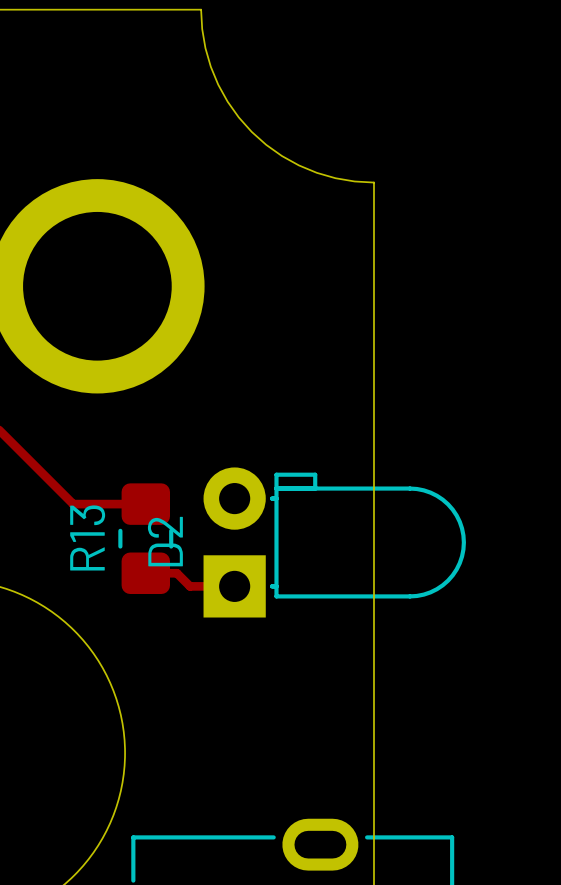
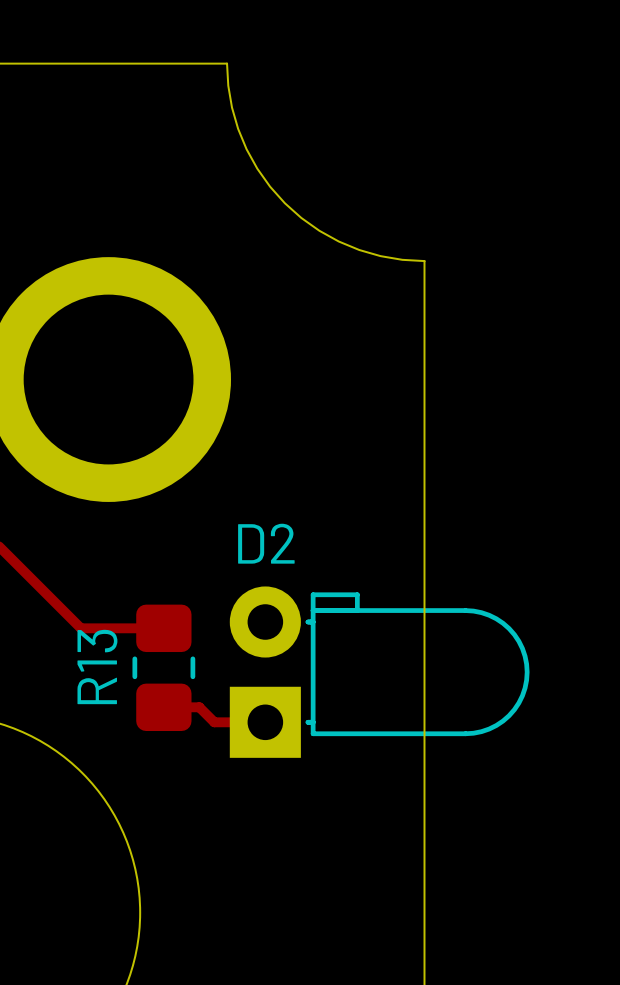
D2 name rotation: 0° (165, 541) -> 90° clockwise (266, 543)
D2 name position: D2 (165, 541) -> D2 (266, 543)

